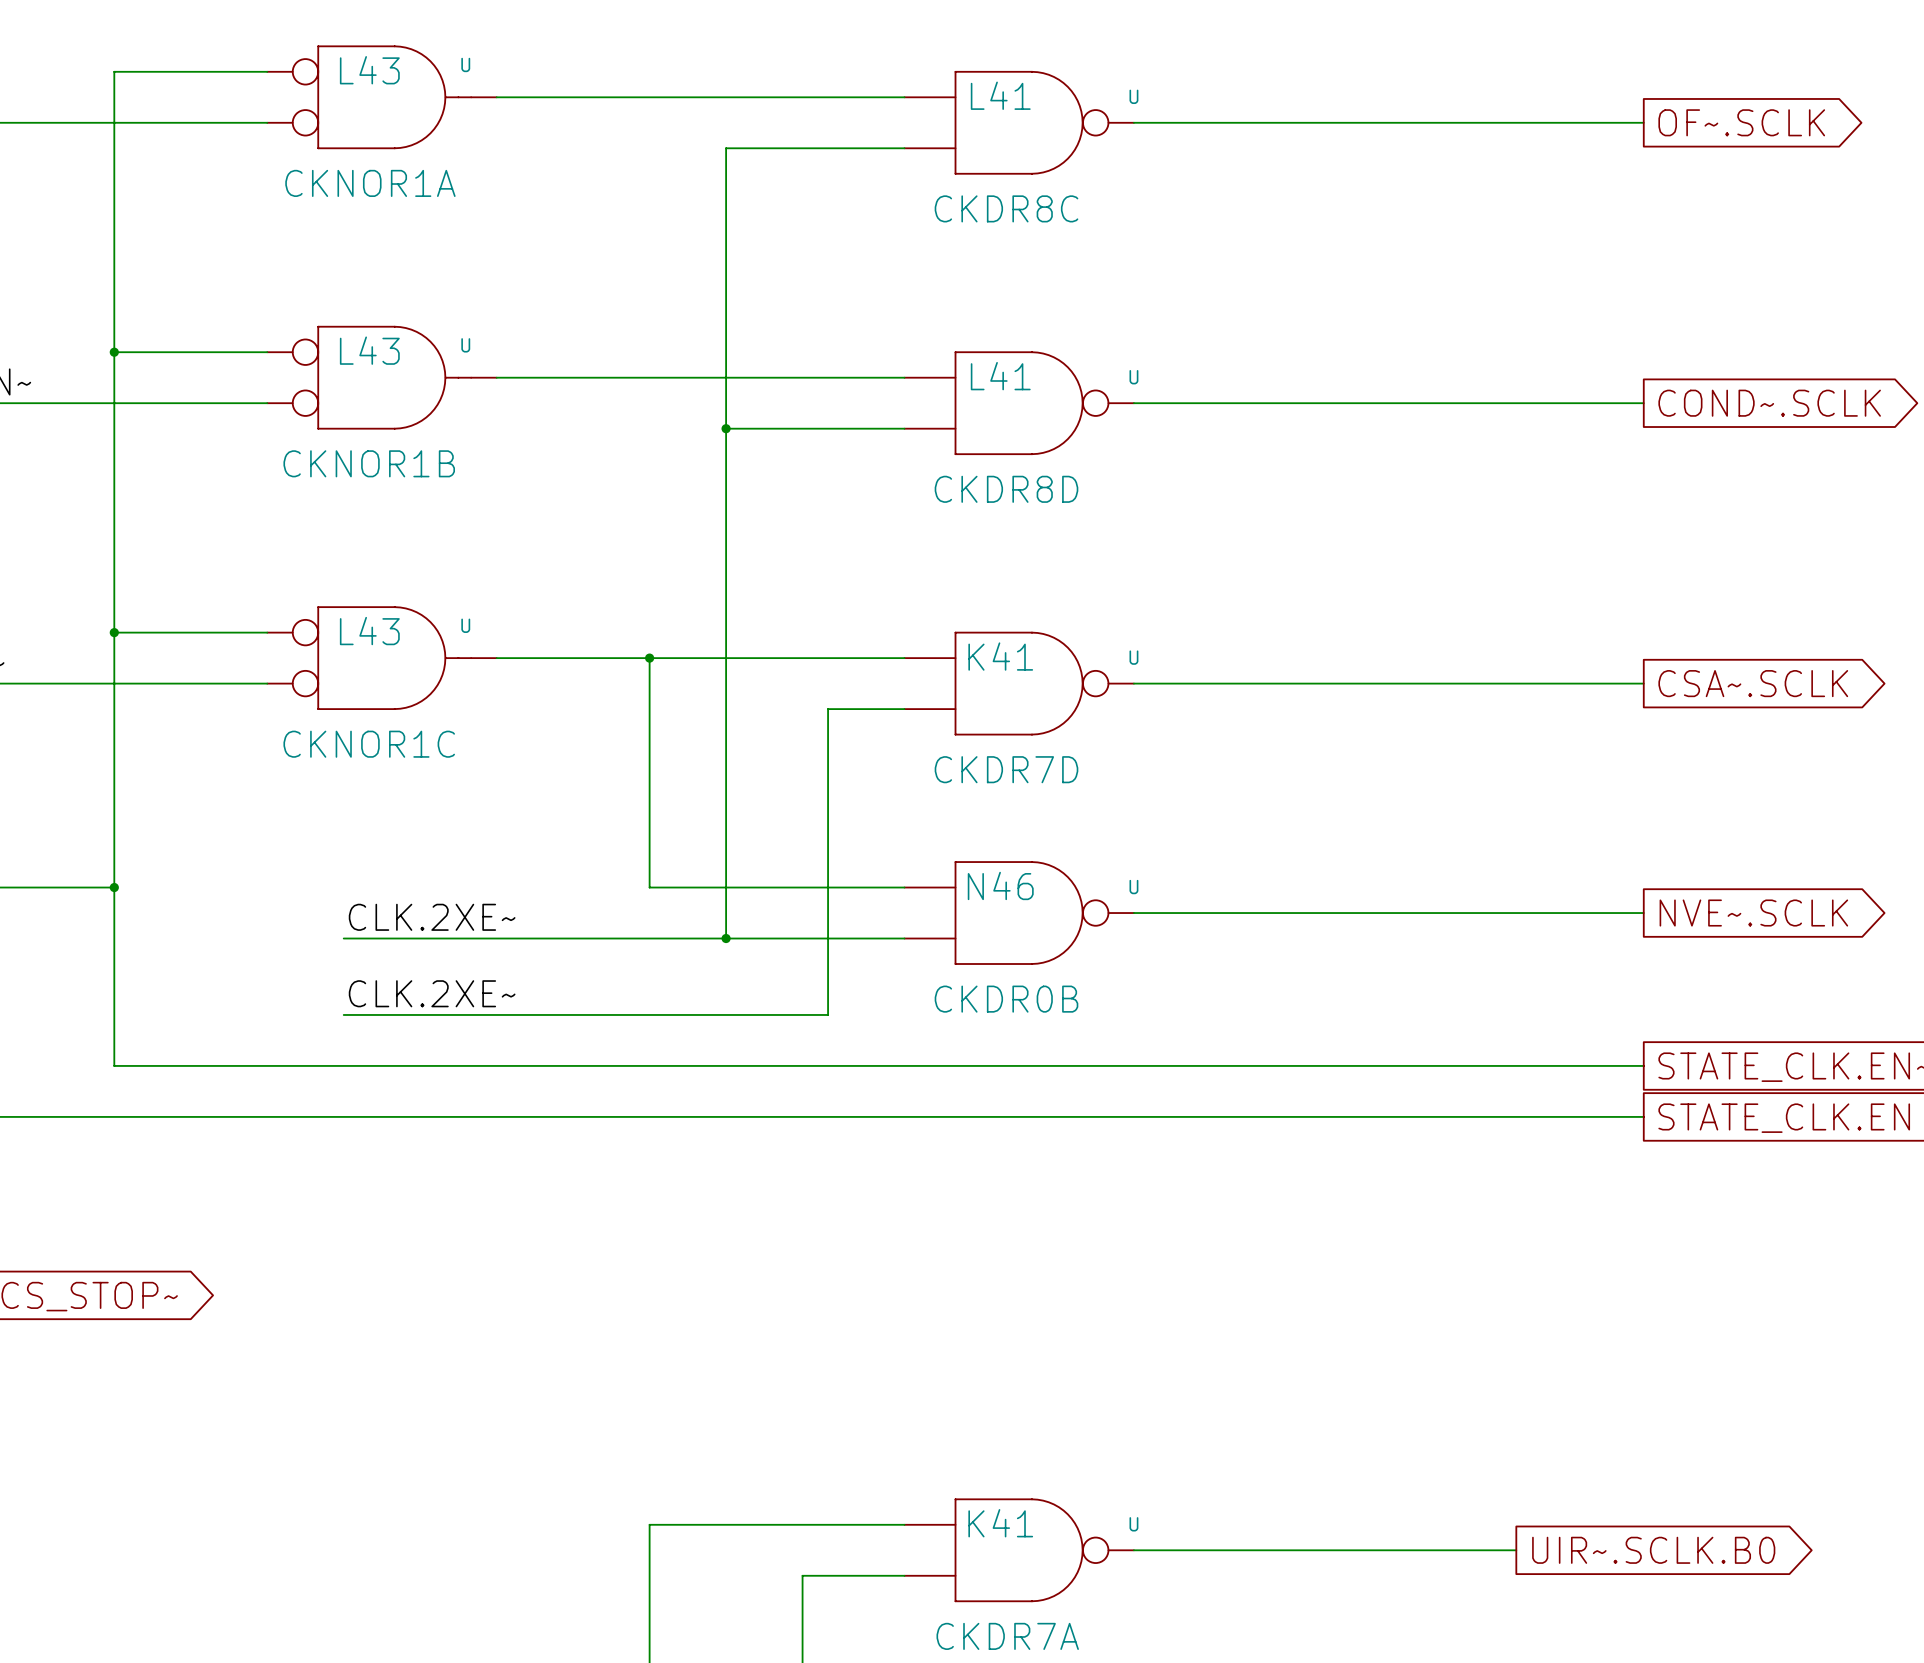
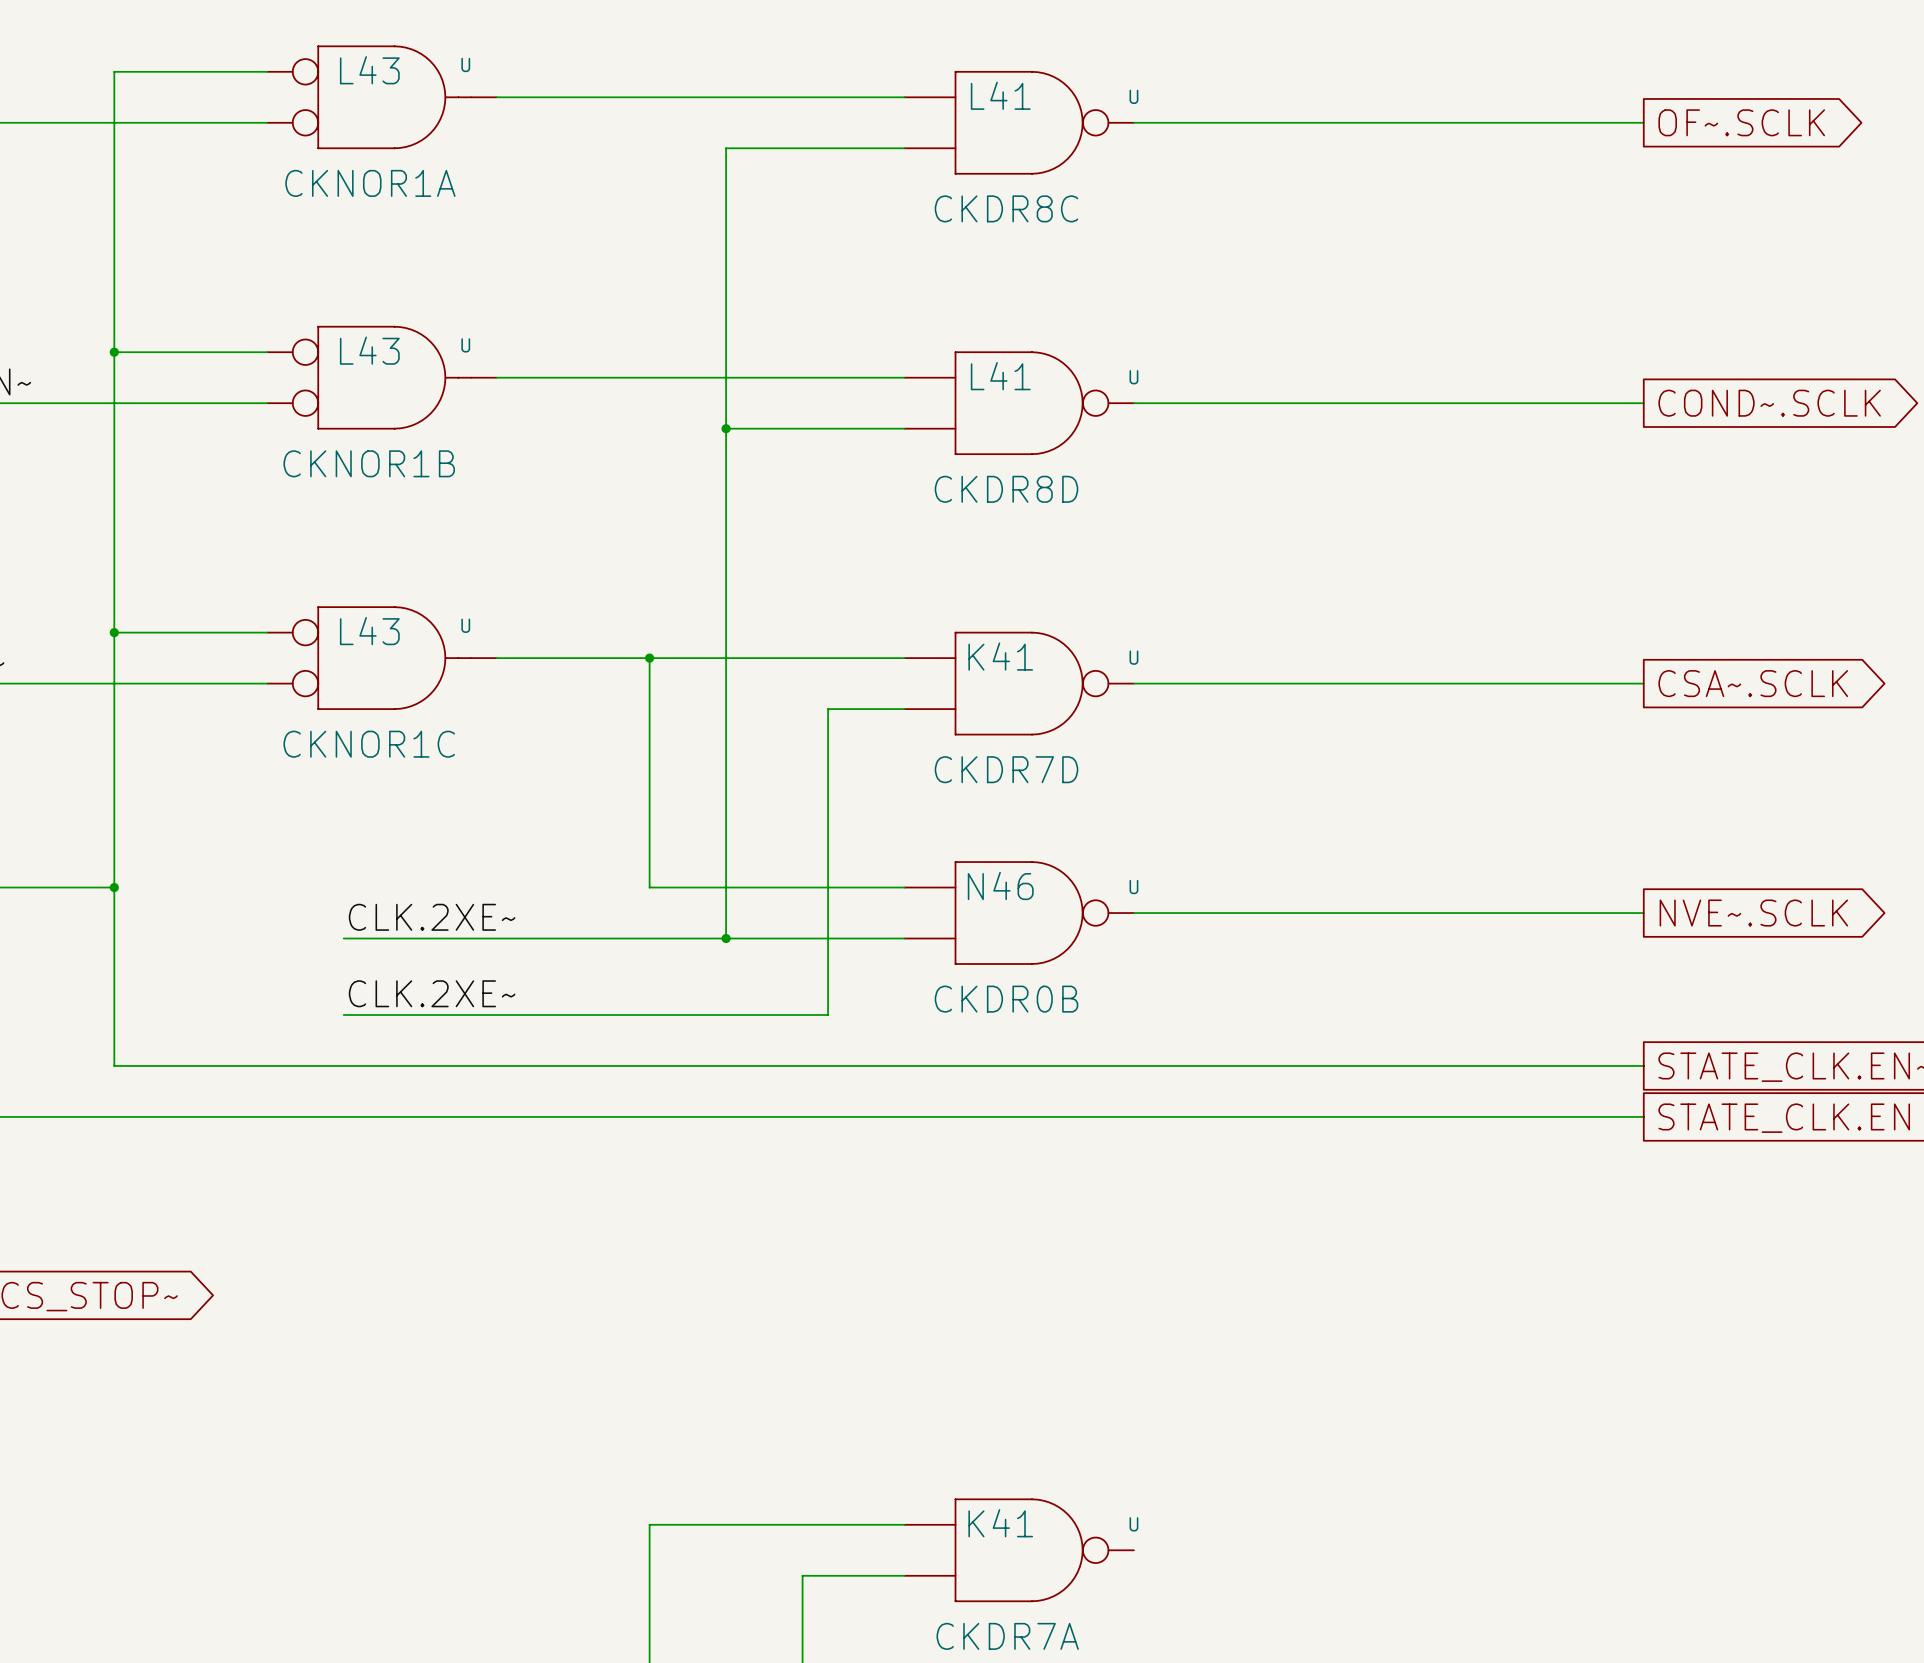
wire: (1133, 1550) (1516, 1550) -> none
global label: UIR~.SCLK.B0 (1653, 1550) -> none

